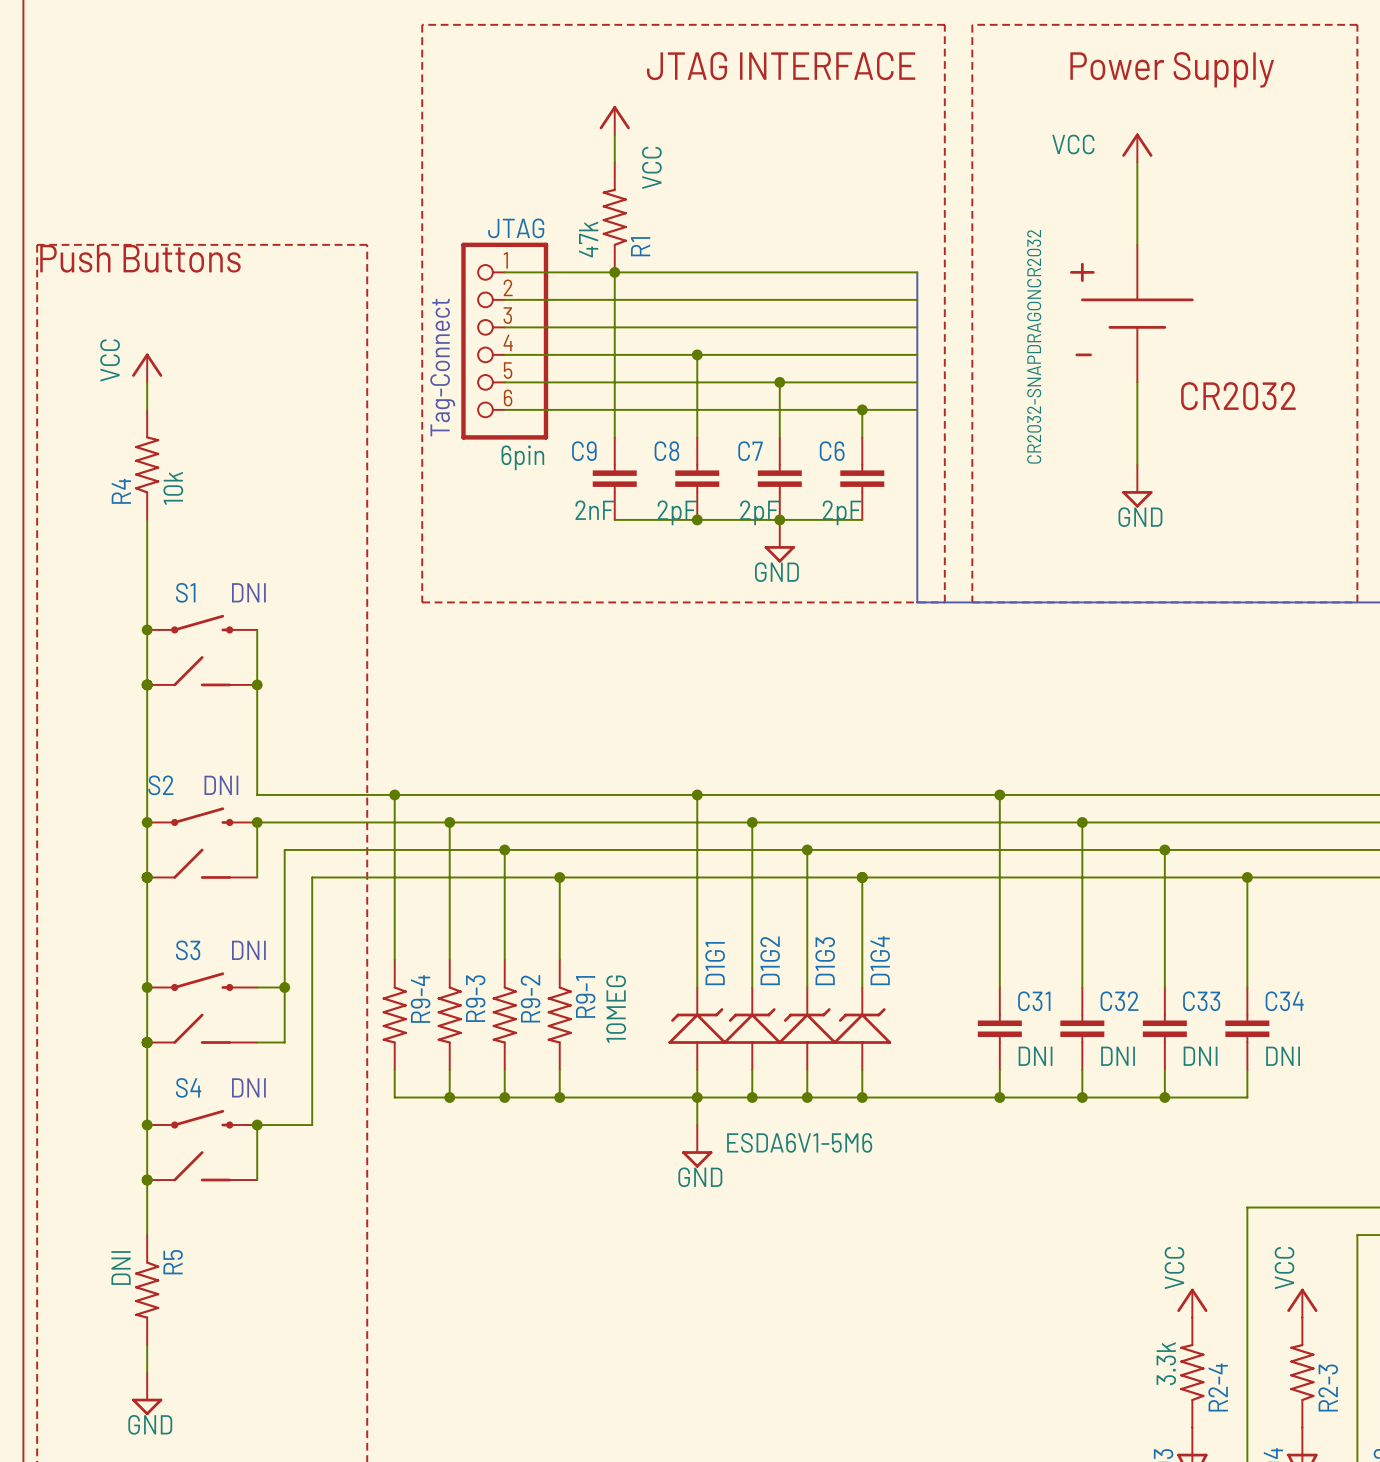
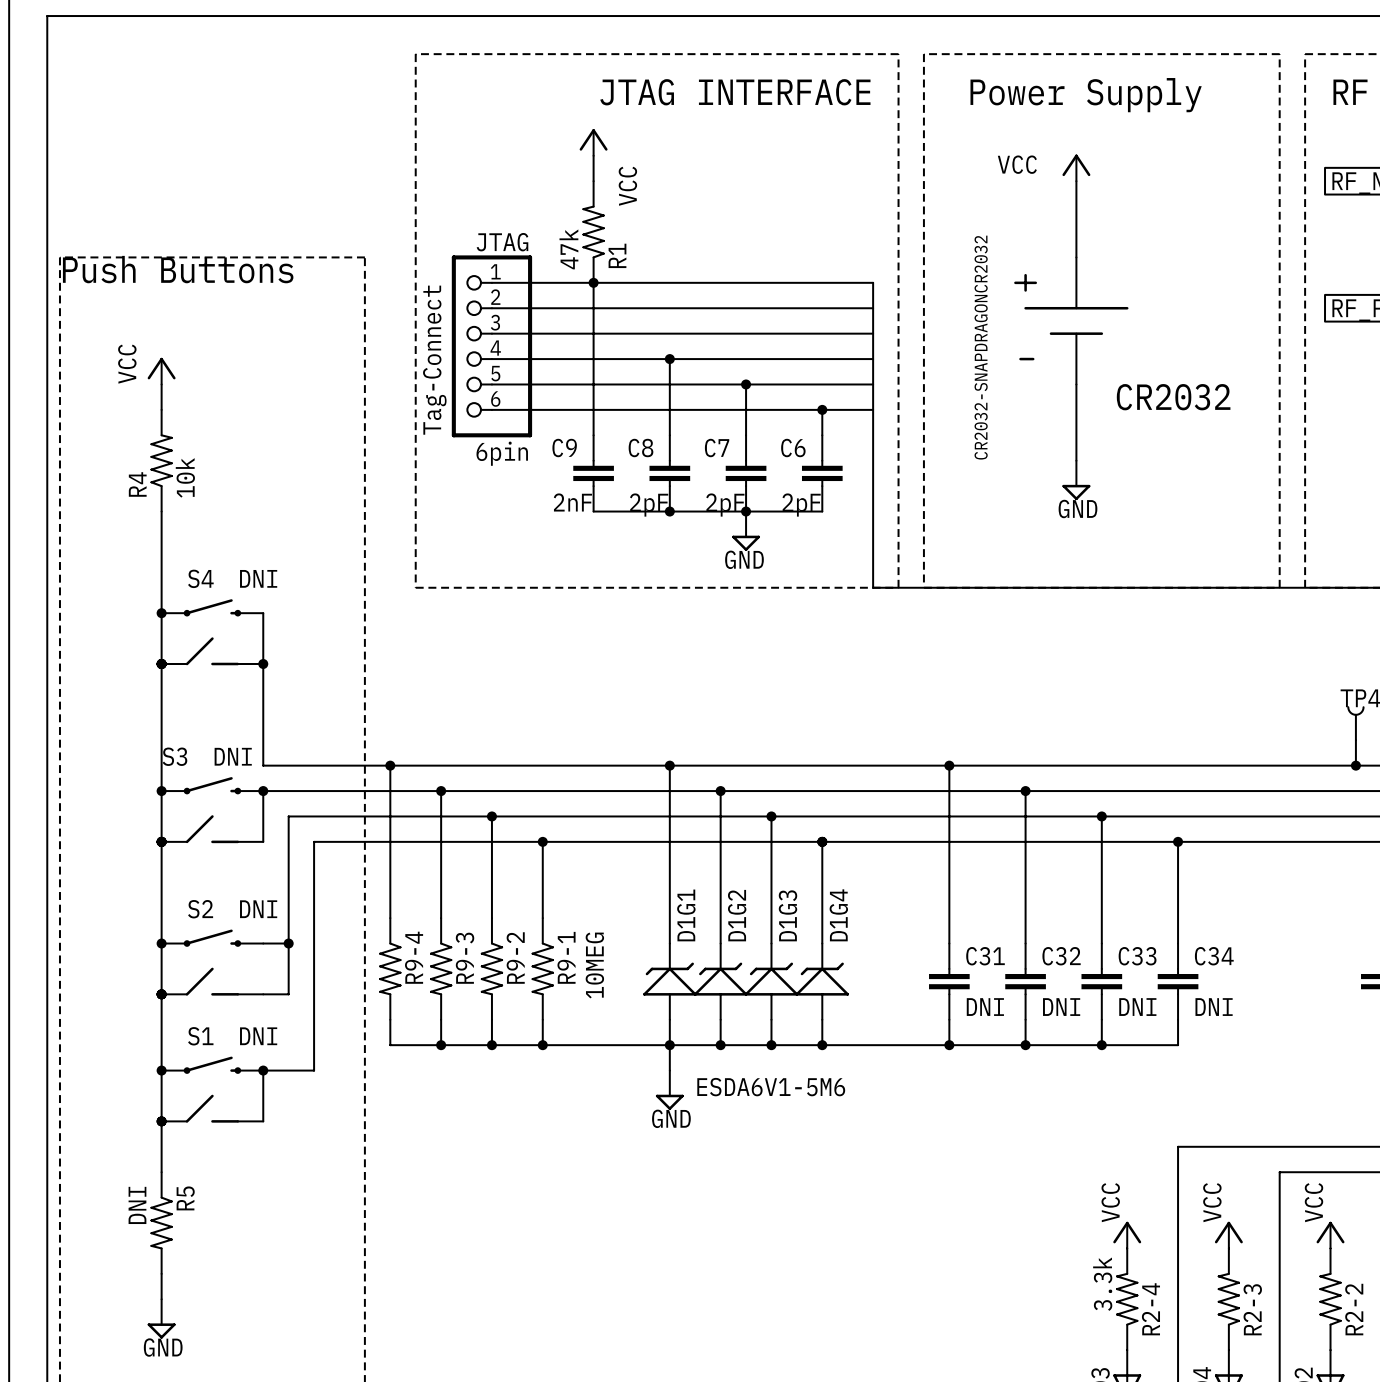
S1 name: S1 (185, 592) -> S4 (200, 578)
S2 name: S2 (160, 785) -> S3 (174, 756)
S3 name: S3 (188, 950) -> S2 (200, 909)
S4 name: S4 (188, 1087) -> S1 (200, 1036)

